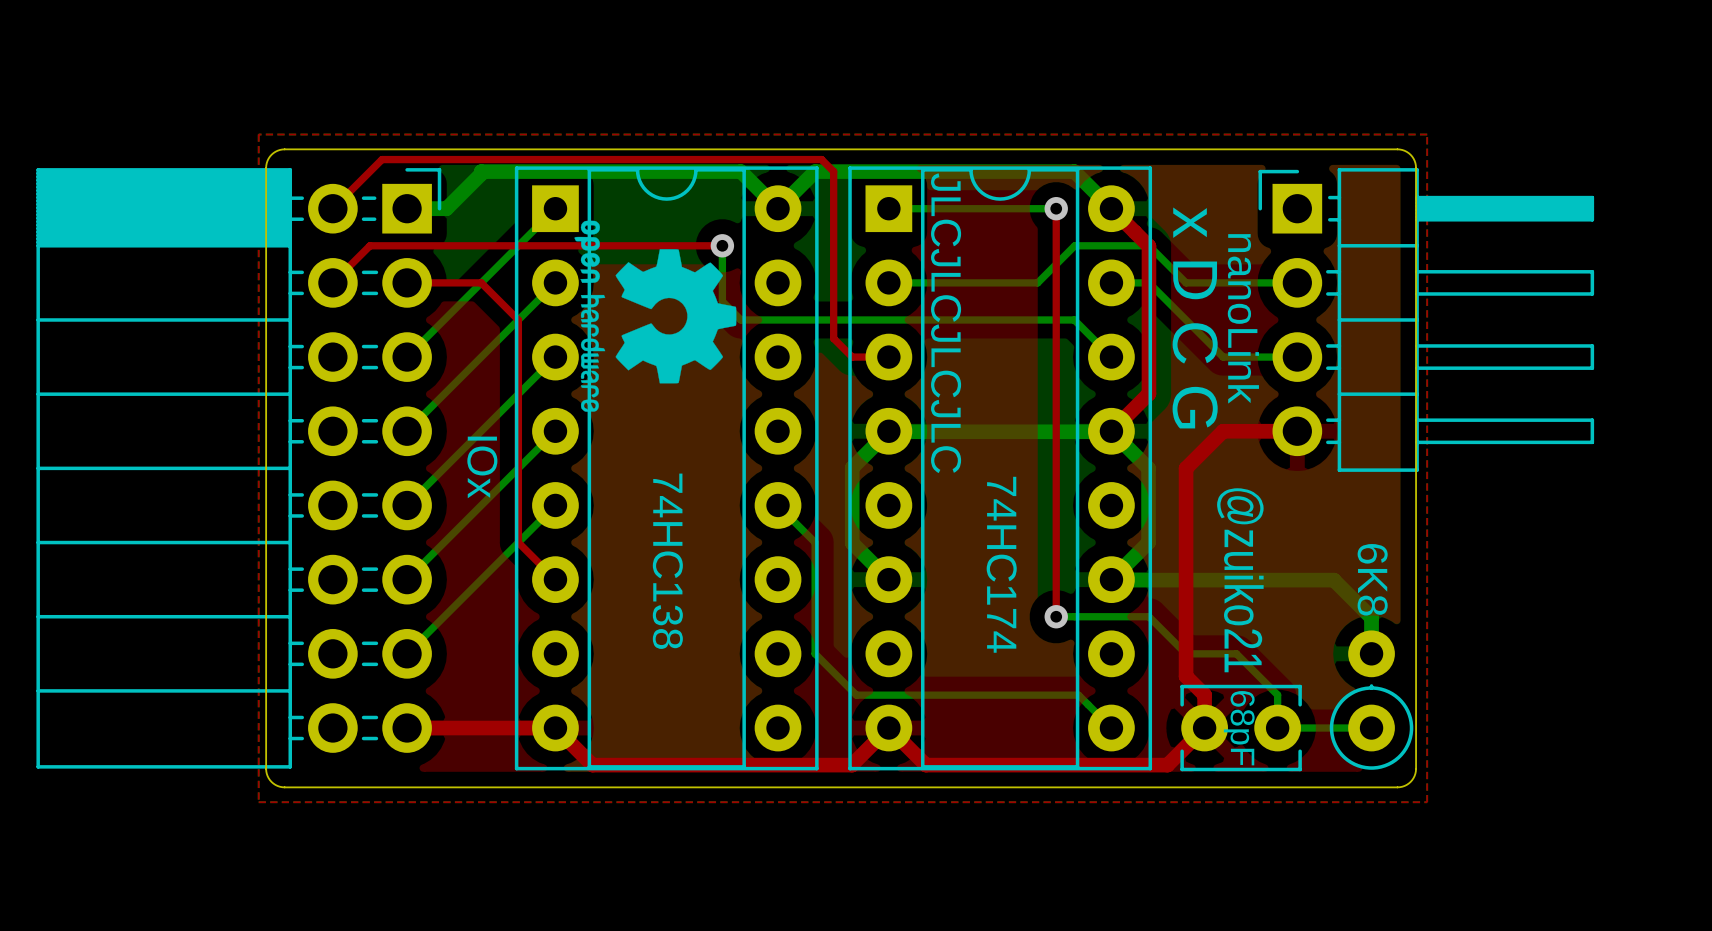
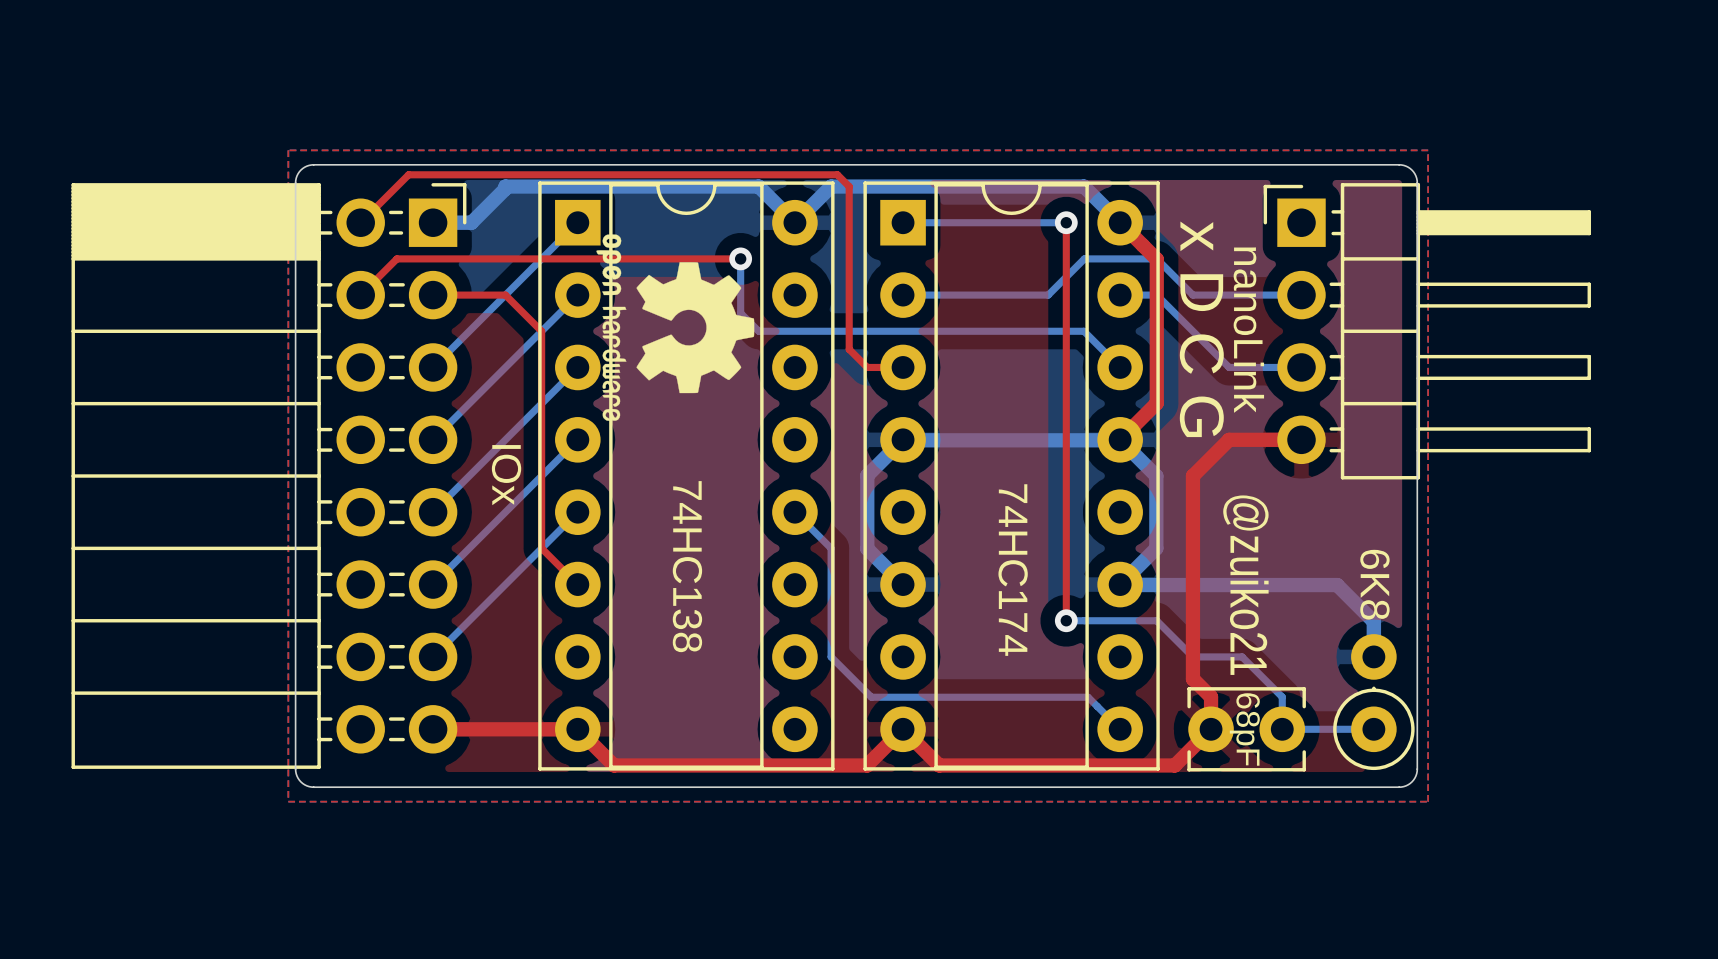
text: JLCJLCJLCJLC (946, 323) -> none

